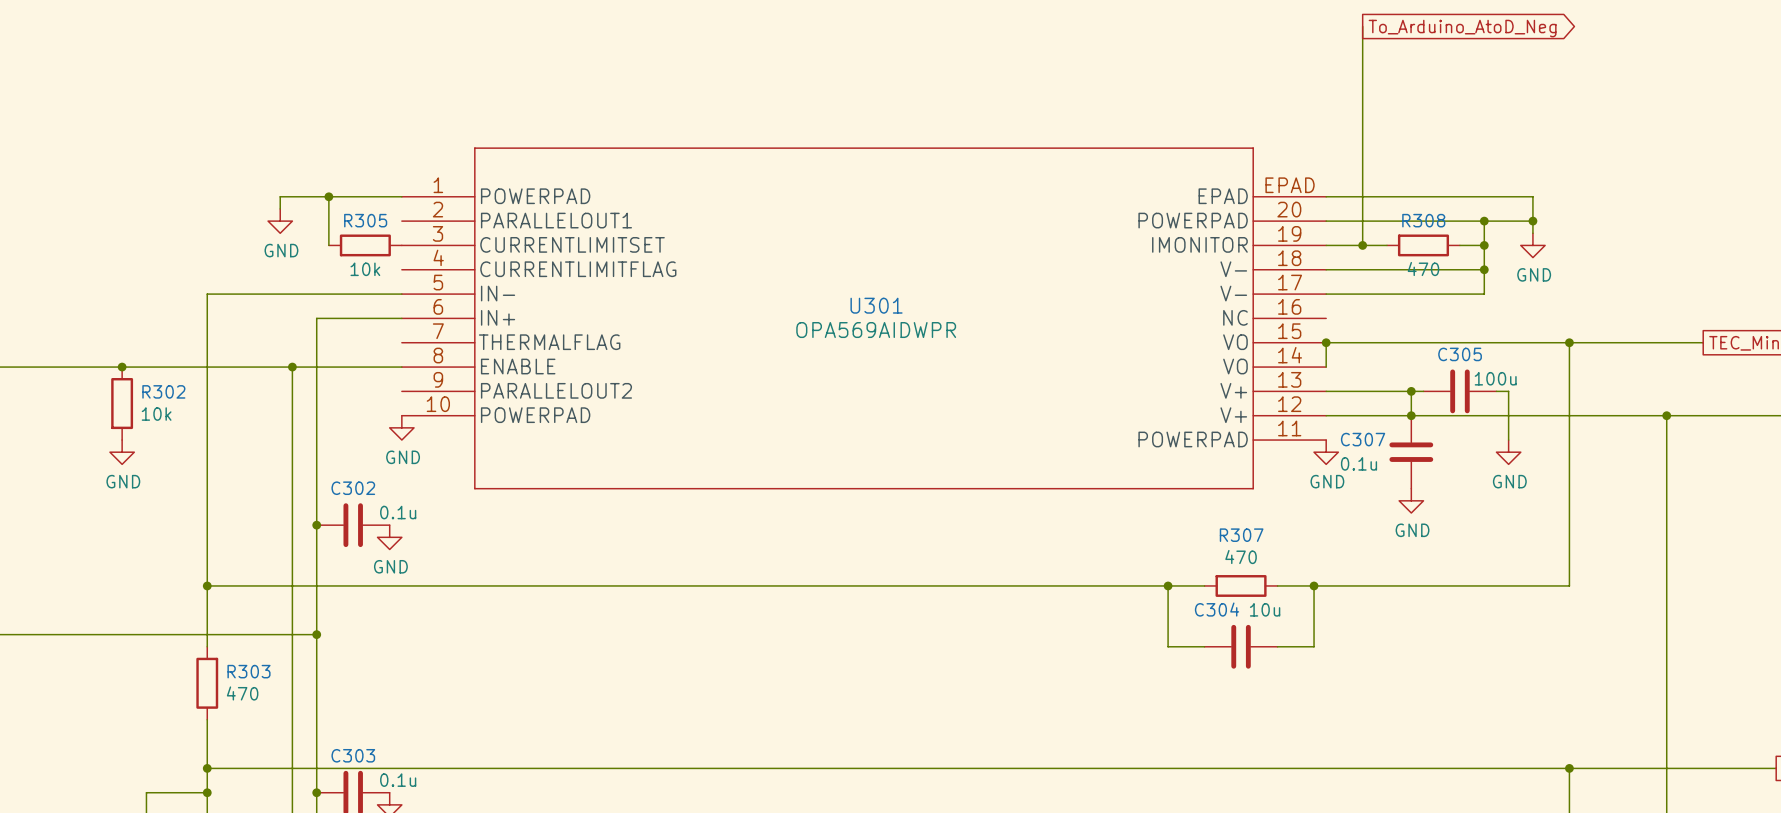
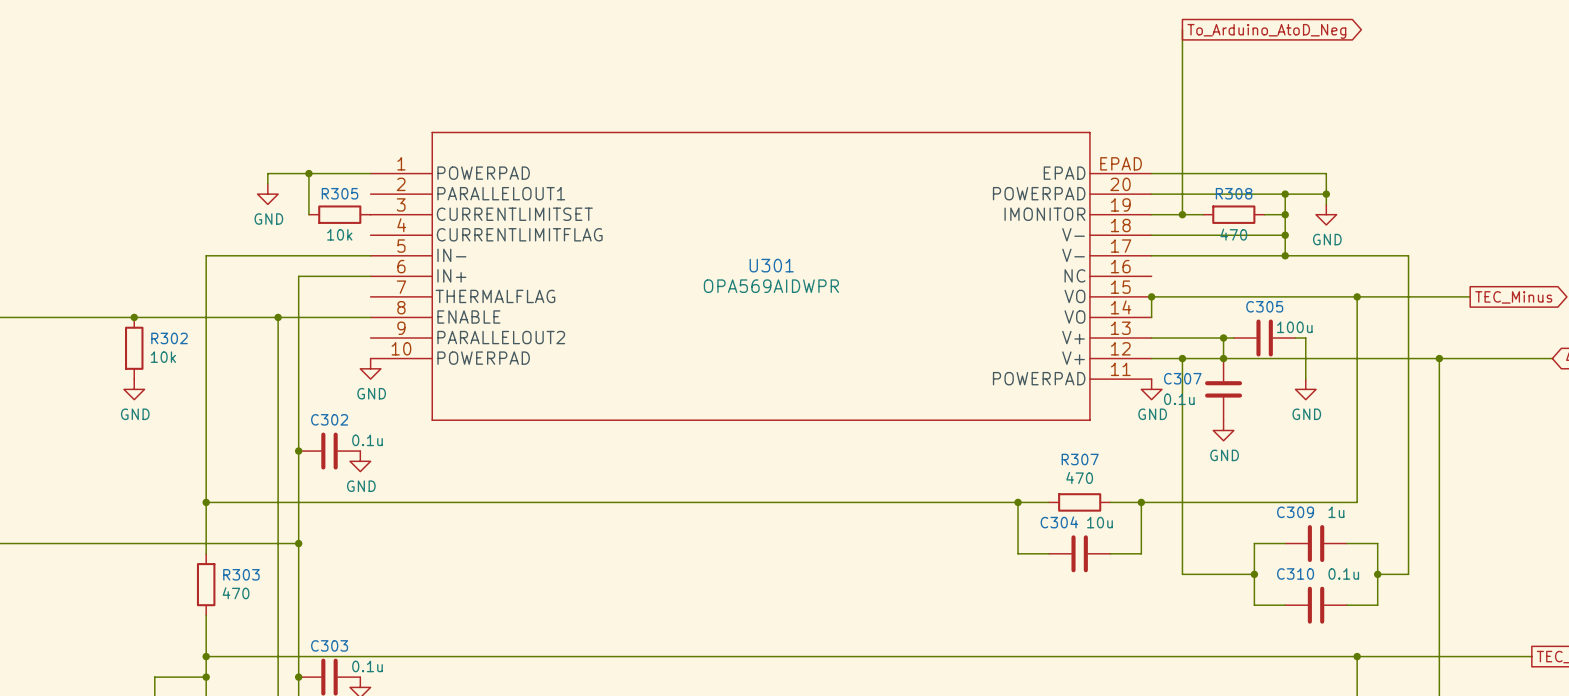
wire: none -> (1285, 255) (1408, 255) (1408, 574) (1377, 574)
junction: none -> (1285, 255)
wire: none -> (1182, 358) (1182, 574) (1254, 574)
junction: none -> (1182, 358)
wire: none -> (1285, 543) (1254, 543) (1254, 605) (1285, 605)
C309: none -> 1u (1316, 543)
wire: none -> (1346, 543) (1377, 543) (1377, 605) (1346, 605)
junction: none -> (1254, 574)
junction: none -> (1377, 574)
C310: none -> 0.1u (1316, 605)

